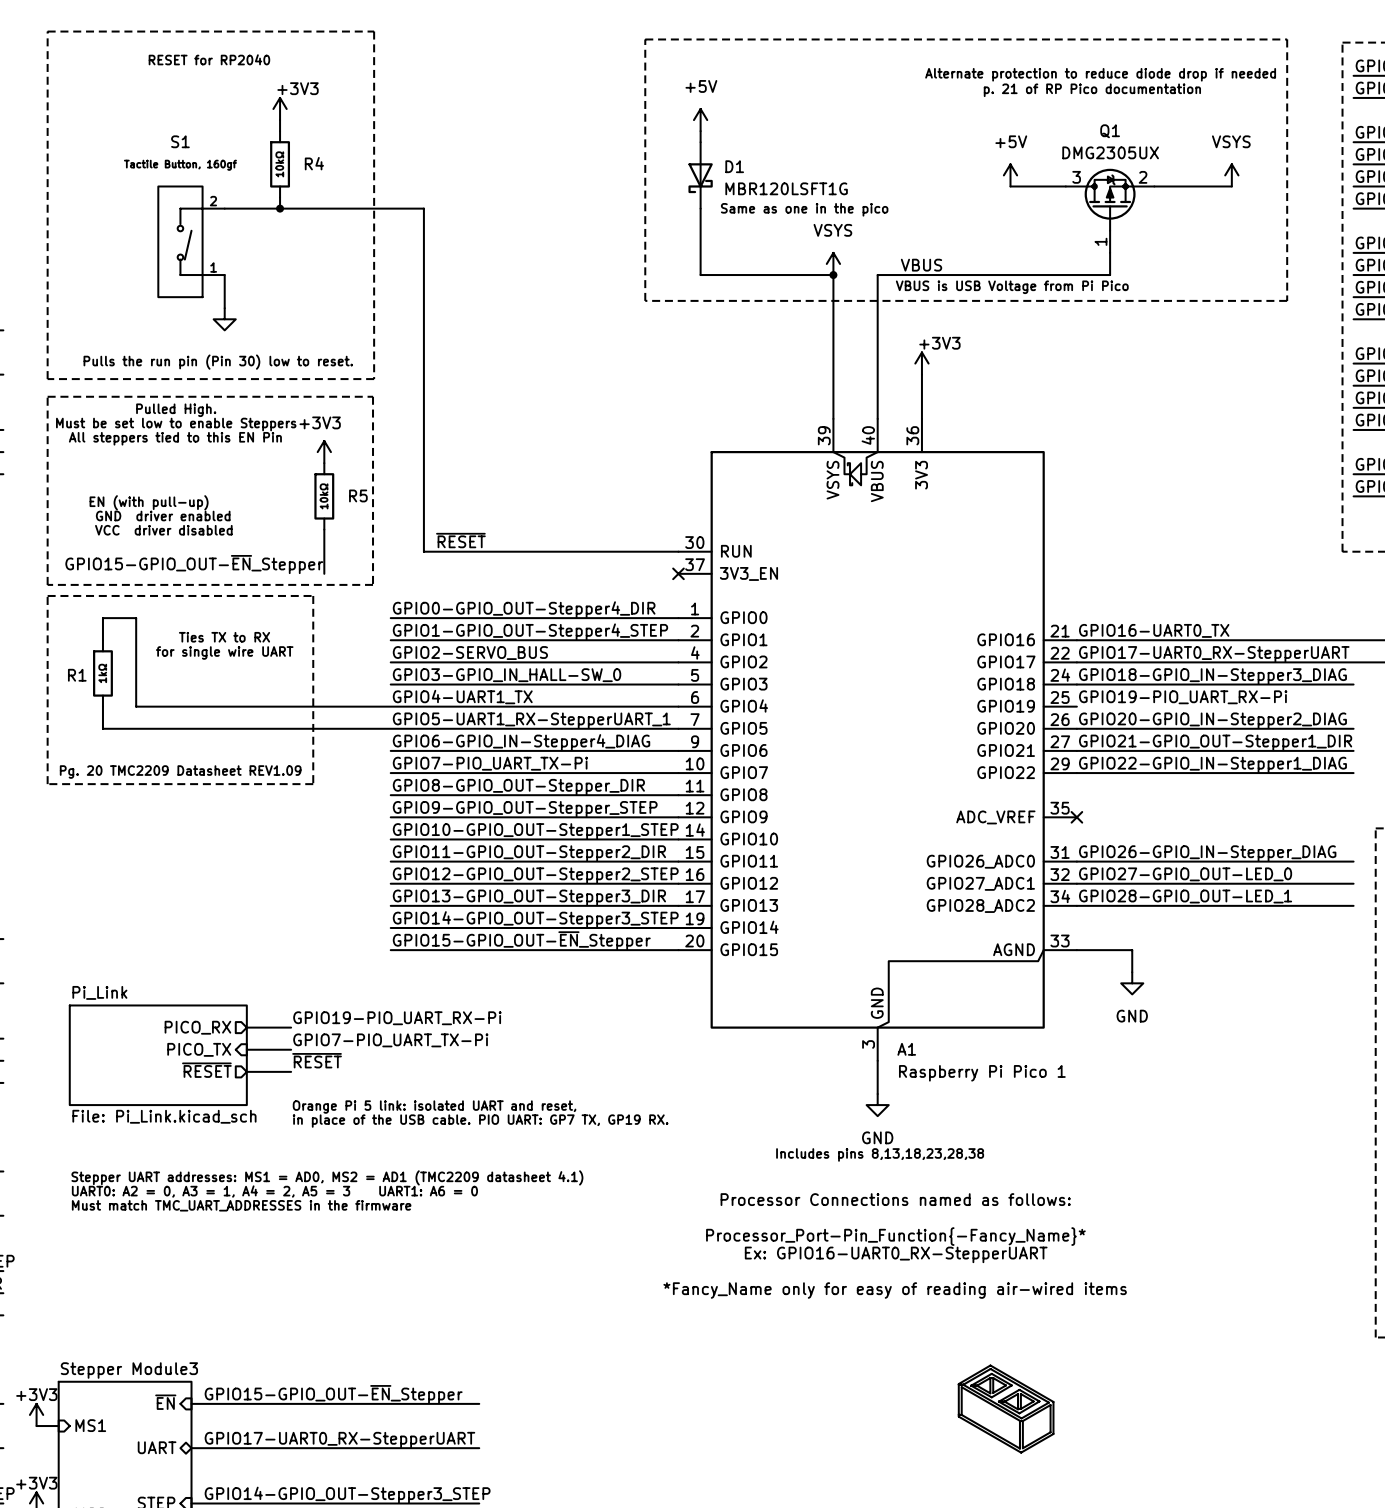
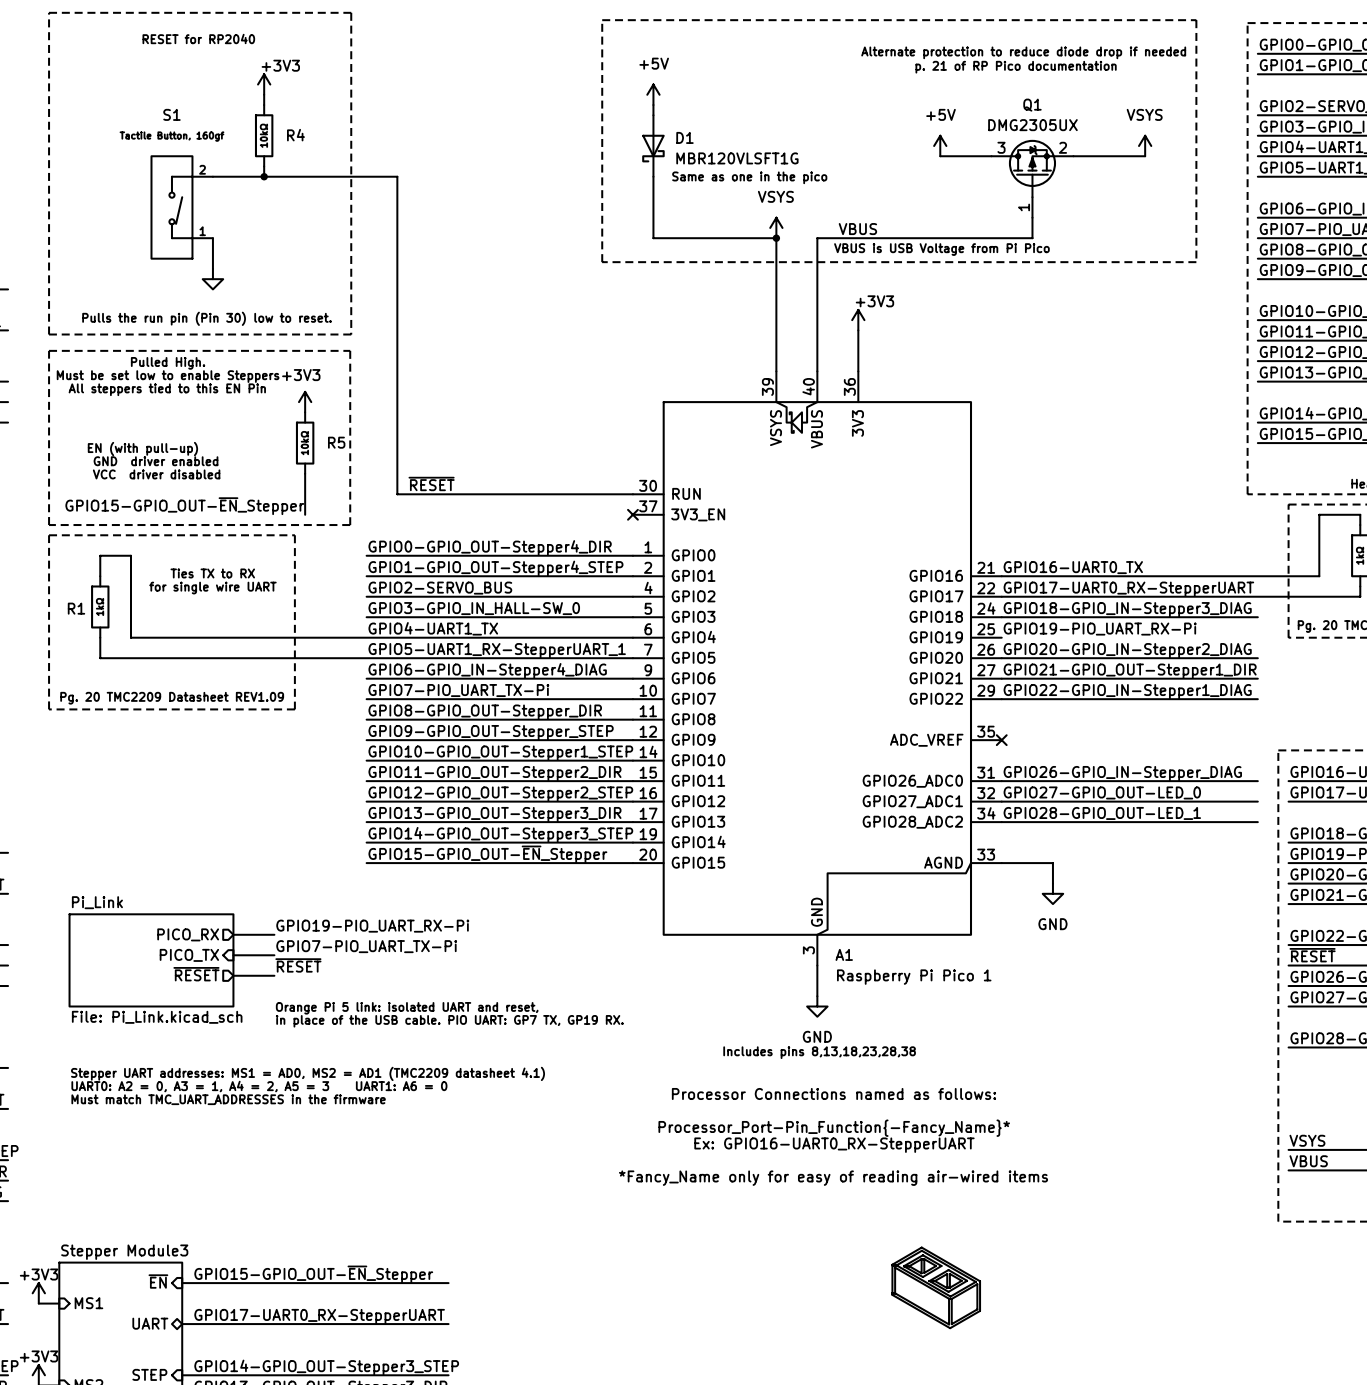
D1 value: MBR120LSFT1G (786, 188) -> MBR120VLSFT1G (737, 158)

